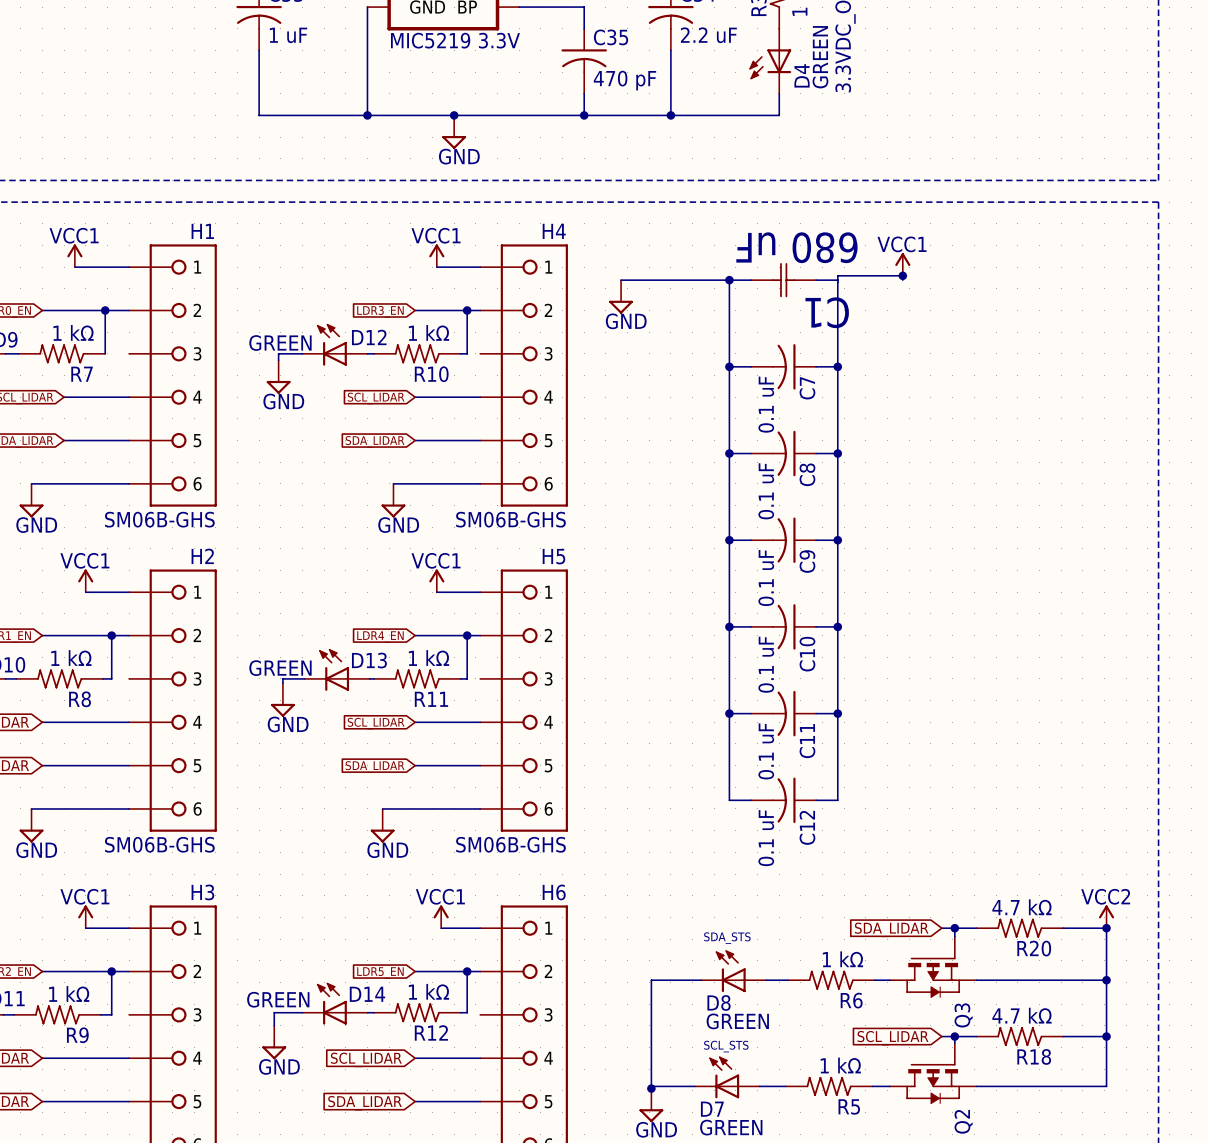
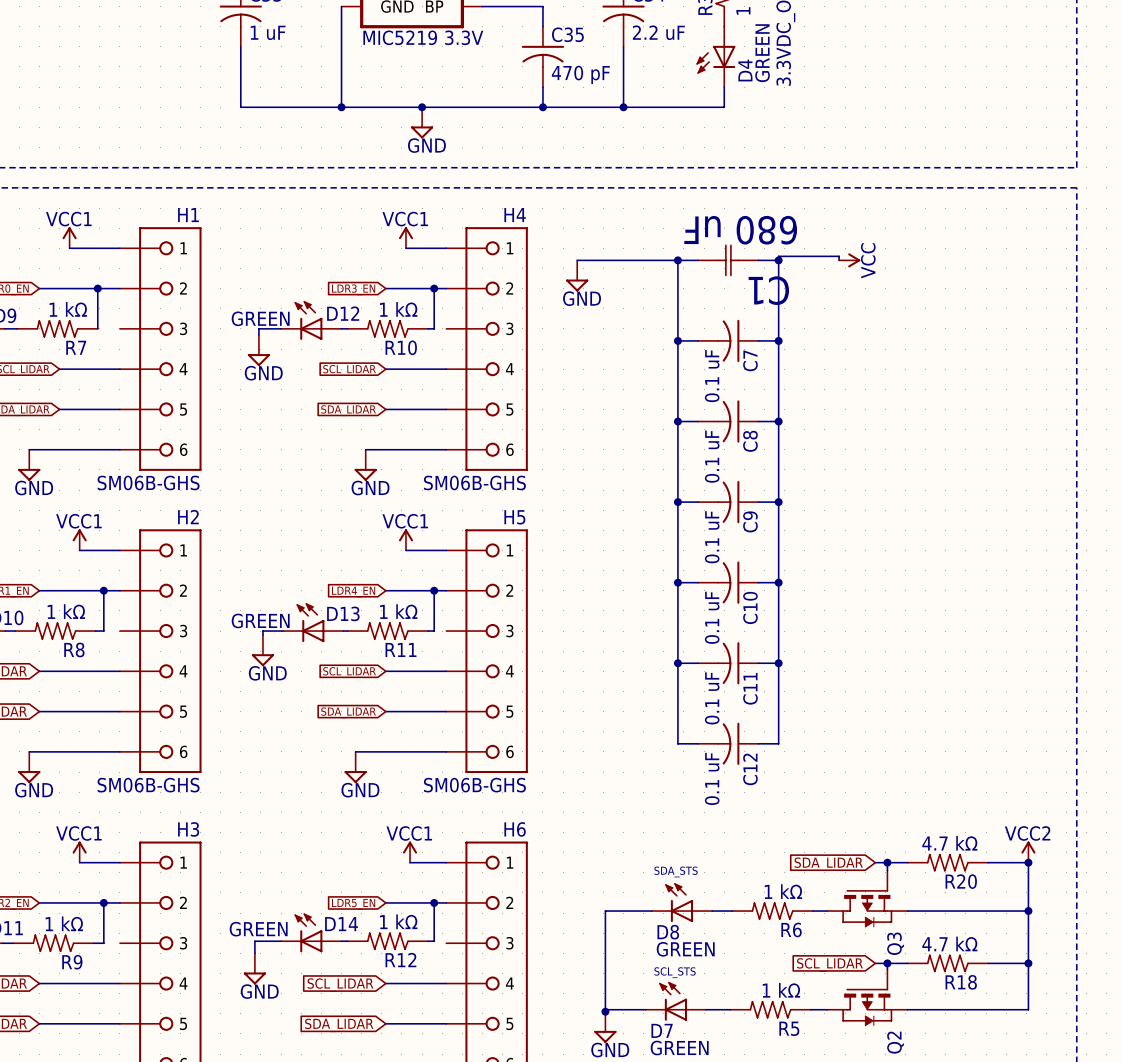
power symbol: VCC1 (902, 264) -> none
junction: (902, 275) -> none
junction: none -> (778, 260)
power symbol: none -> VCC (849, 260)

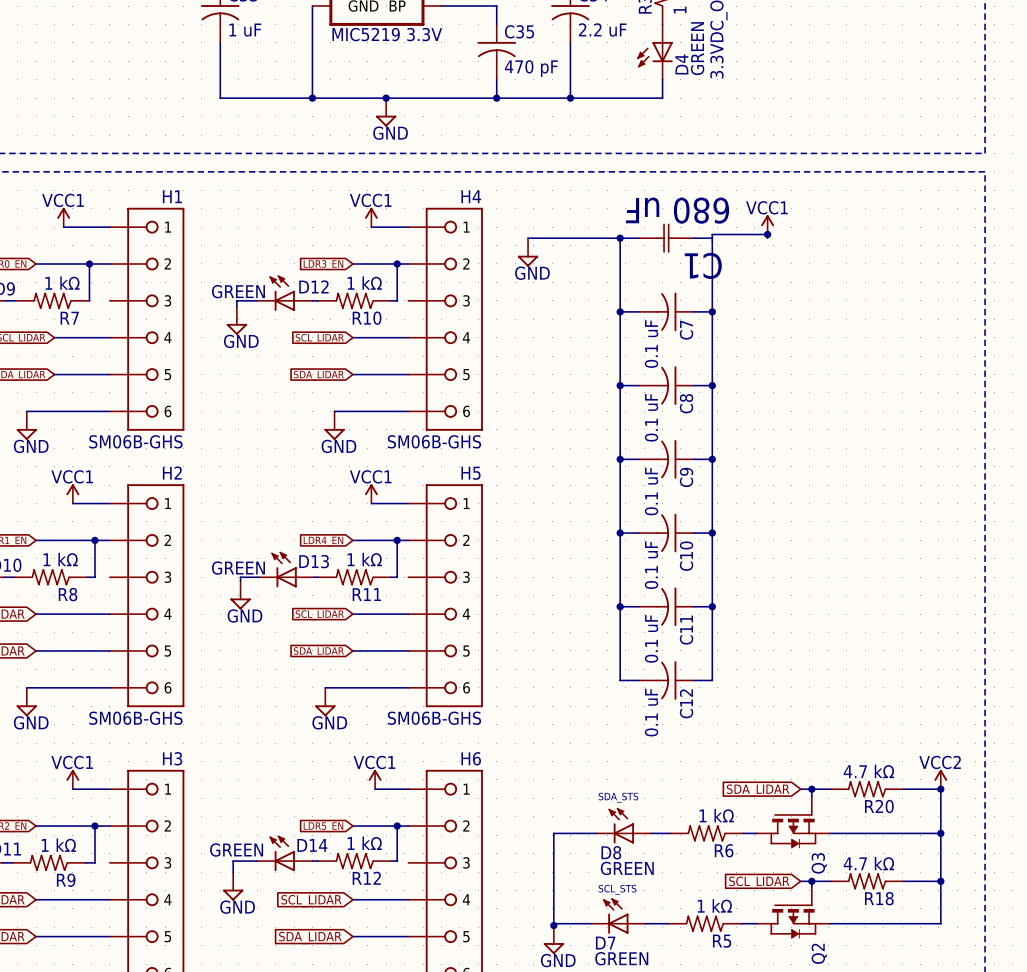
power symbol: none -> VCC1 (767, 224)
junction: none -> (767, 234)
junction: (778, 260) -> none
power symbol: VCC (849, 260) -> none

